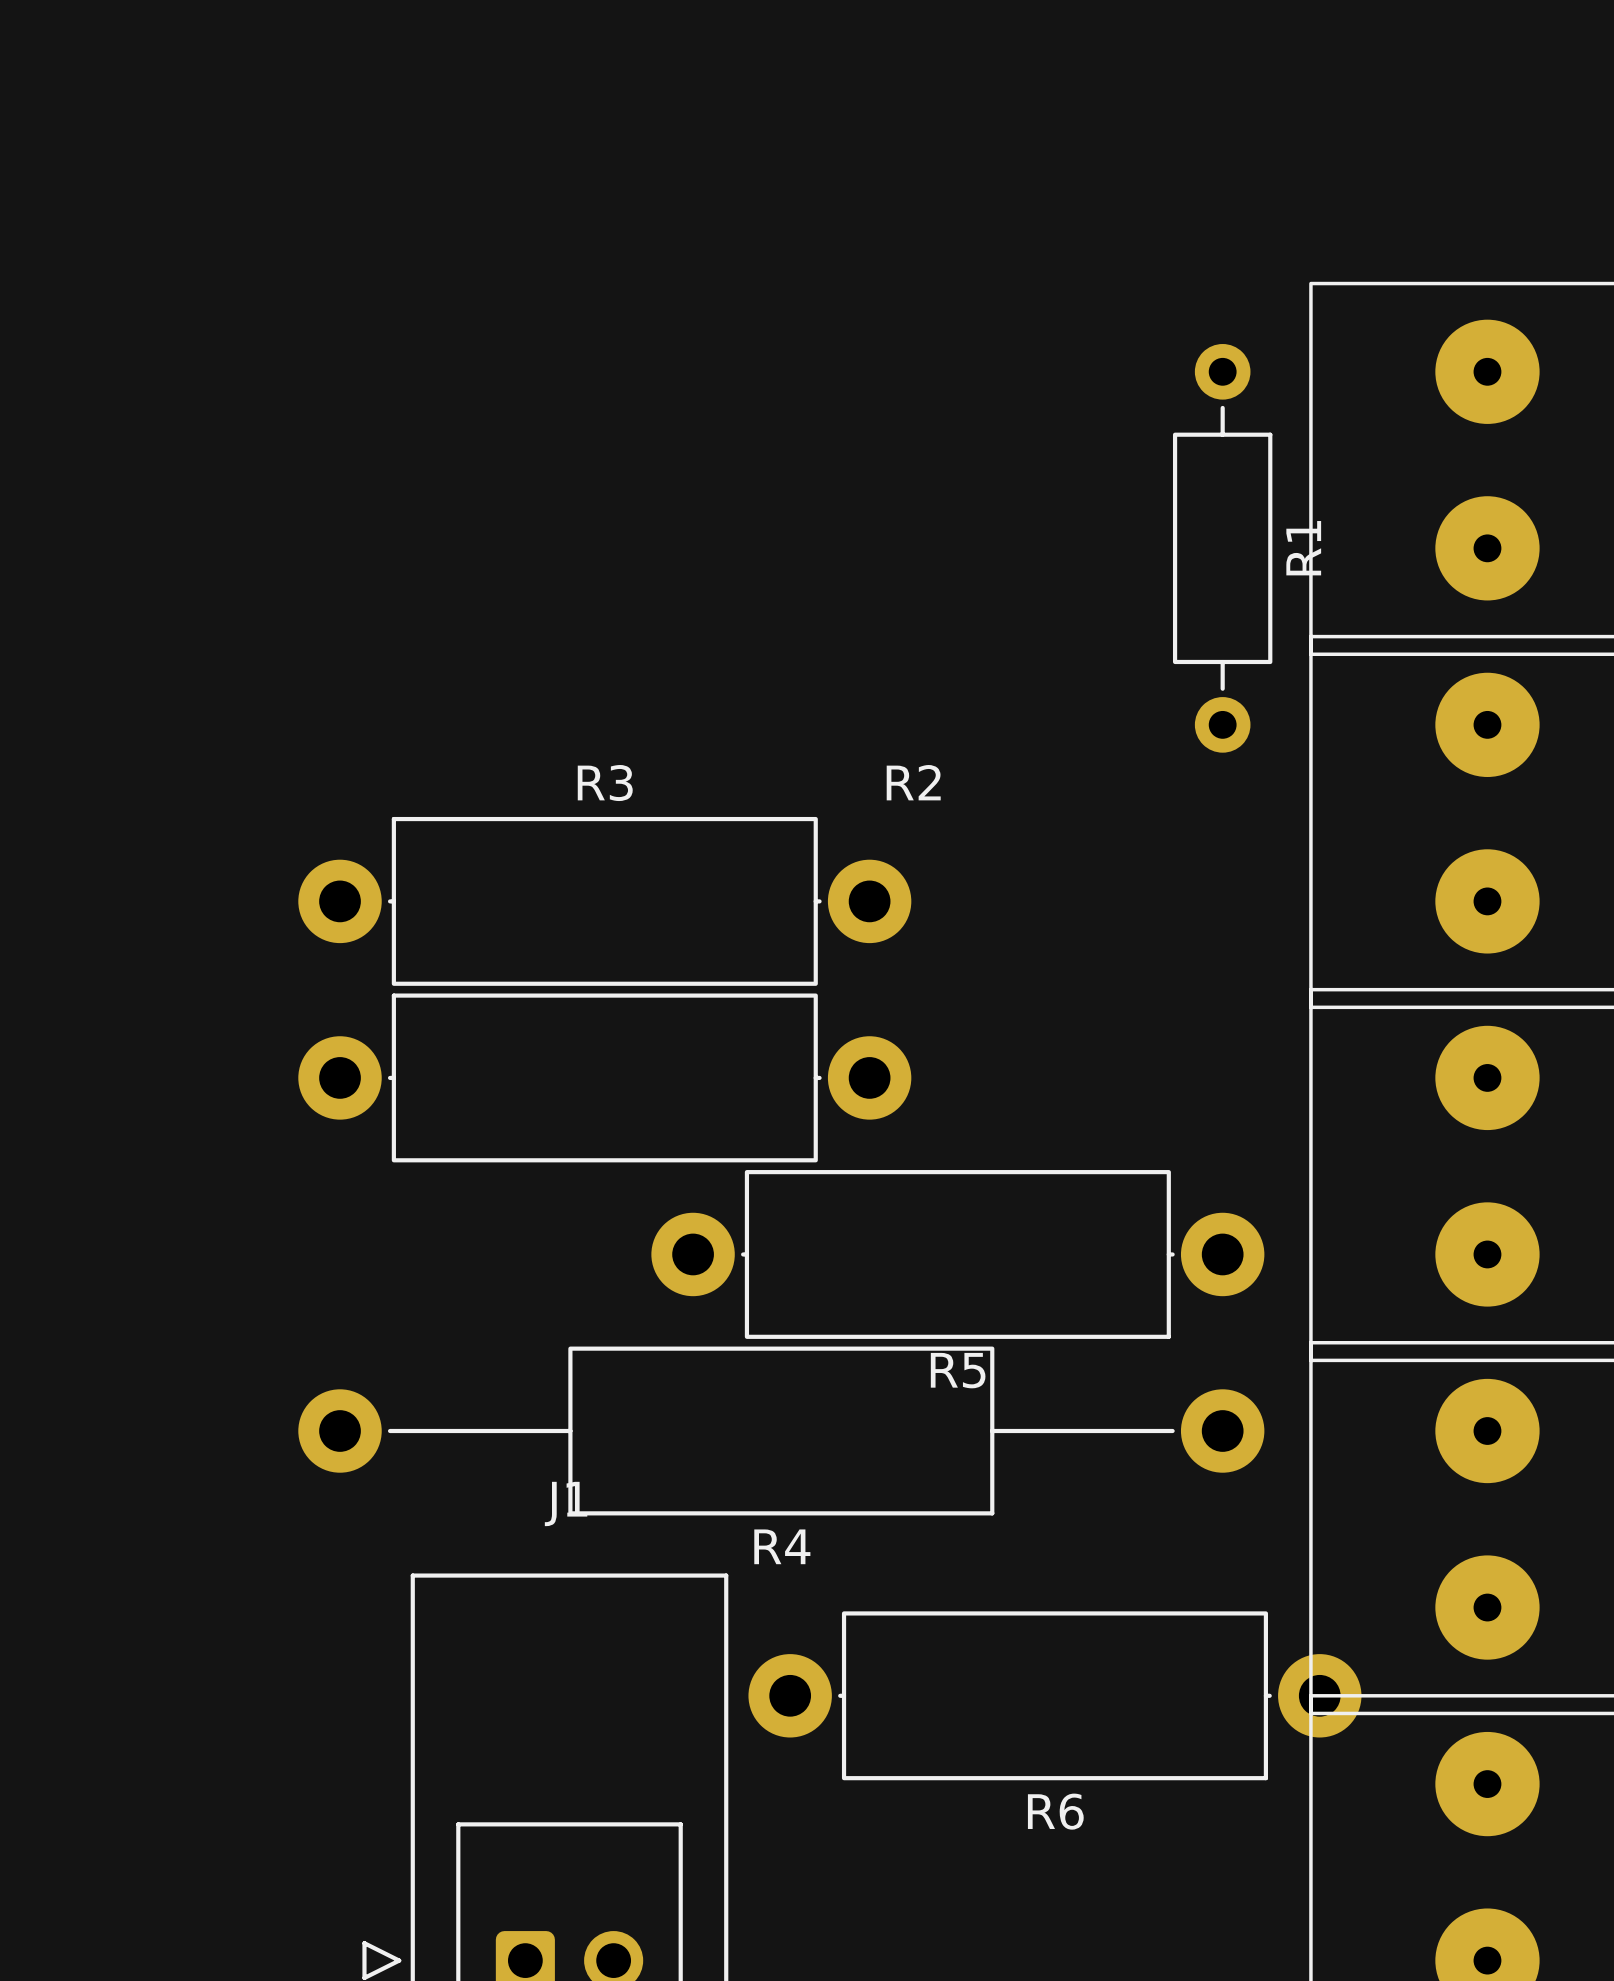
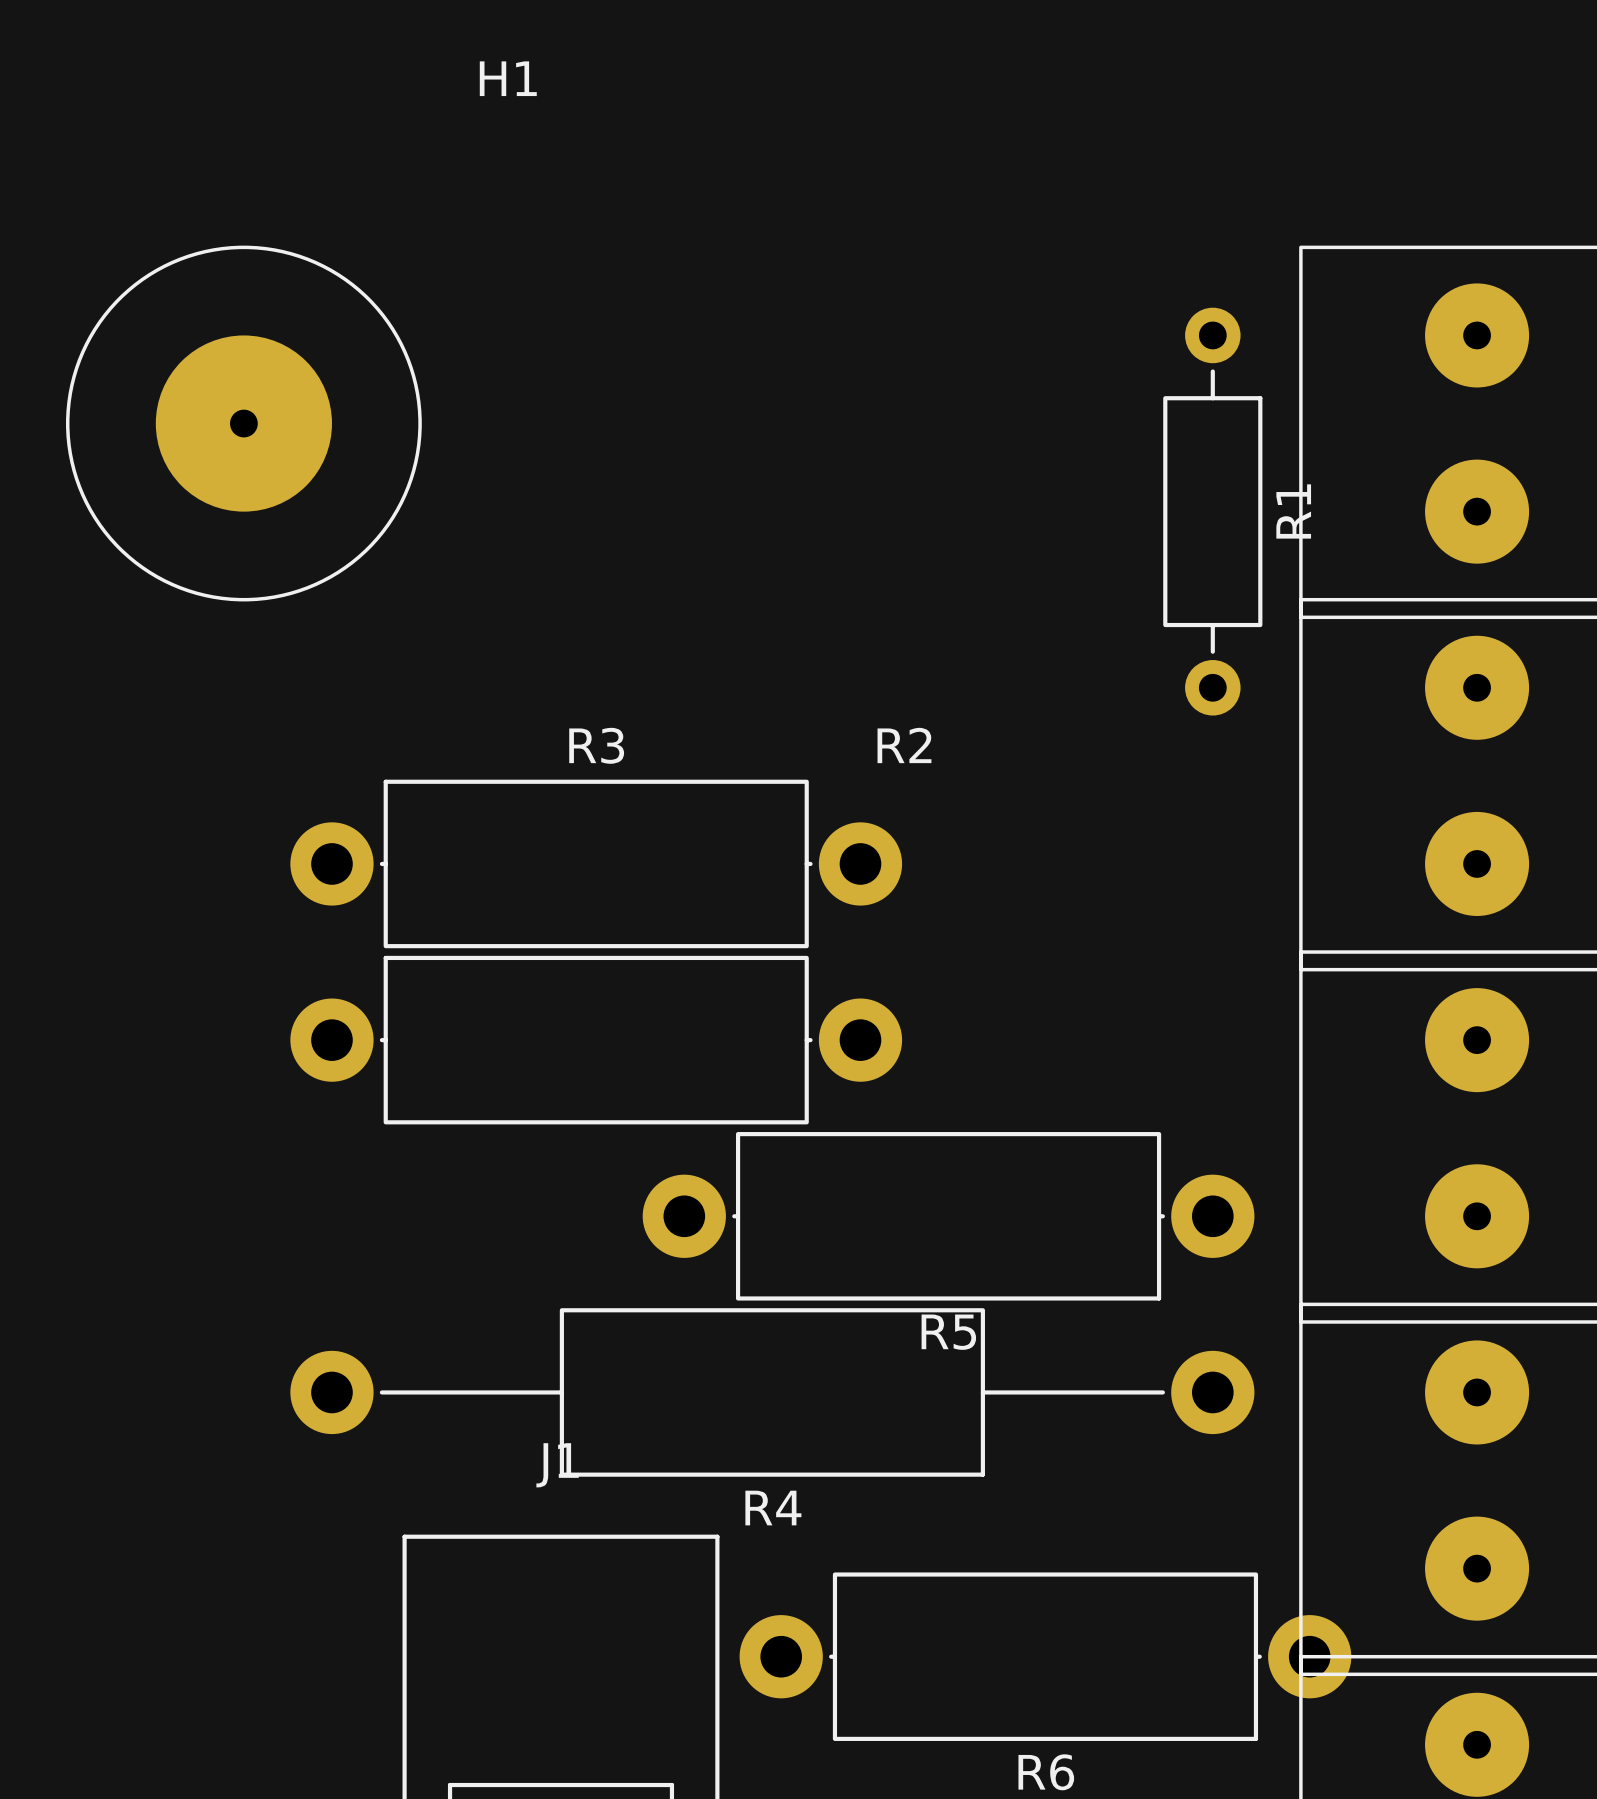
H1: none -> (243, 423)

